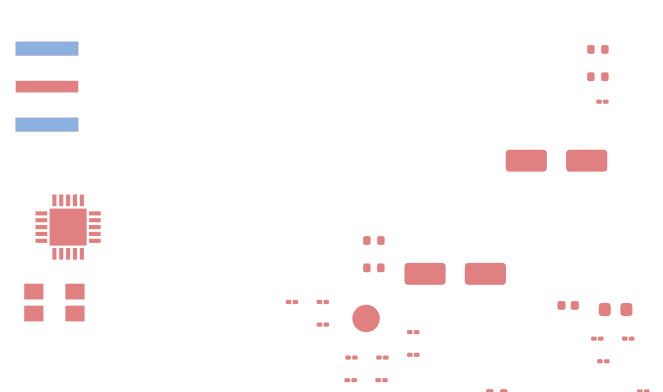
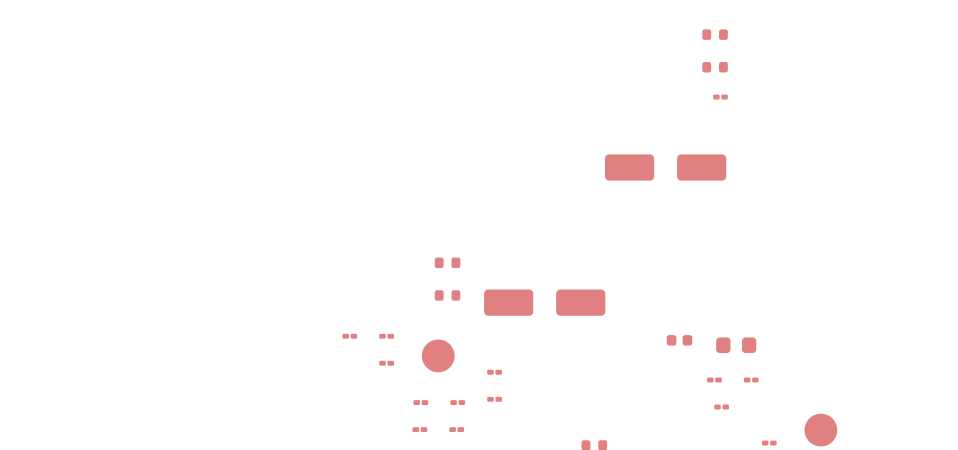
part: (46, 86) -> none
part: (68, 227) -> none
part: (54, 302) -> none

